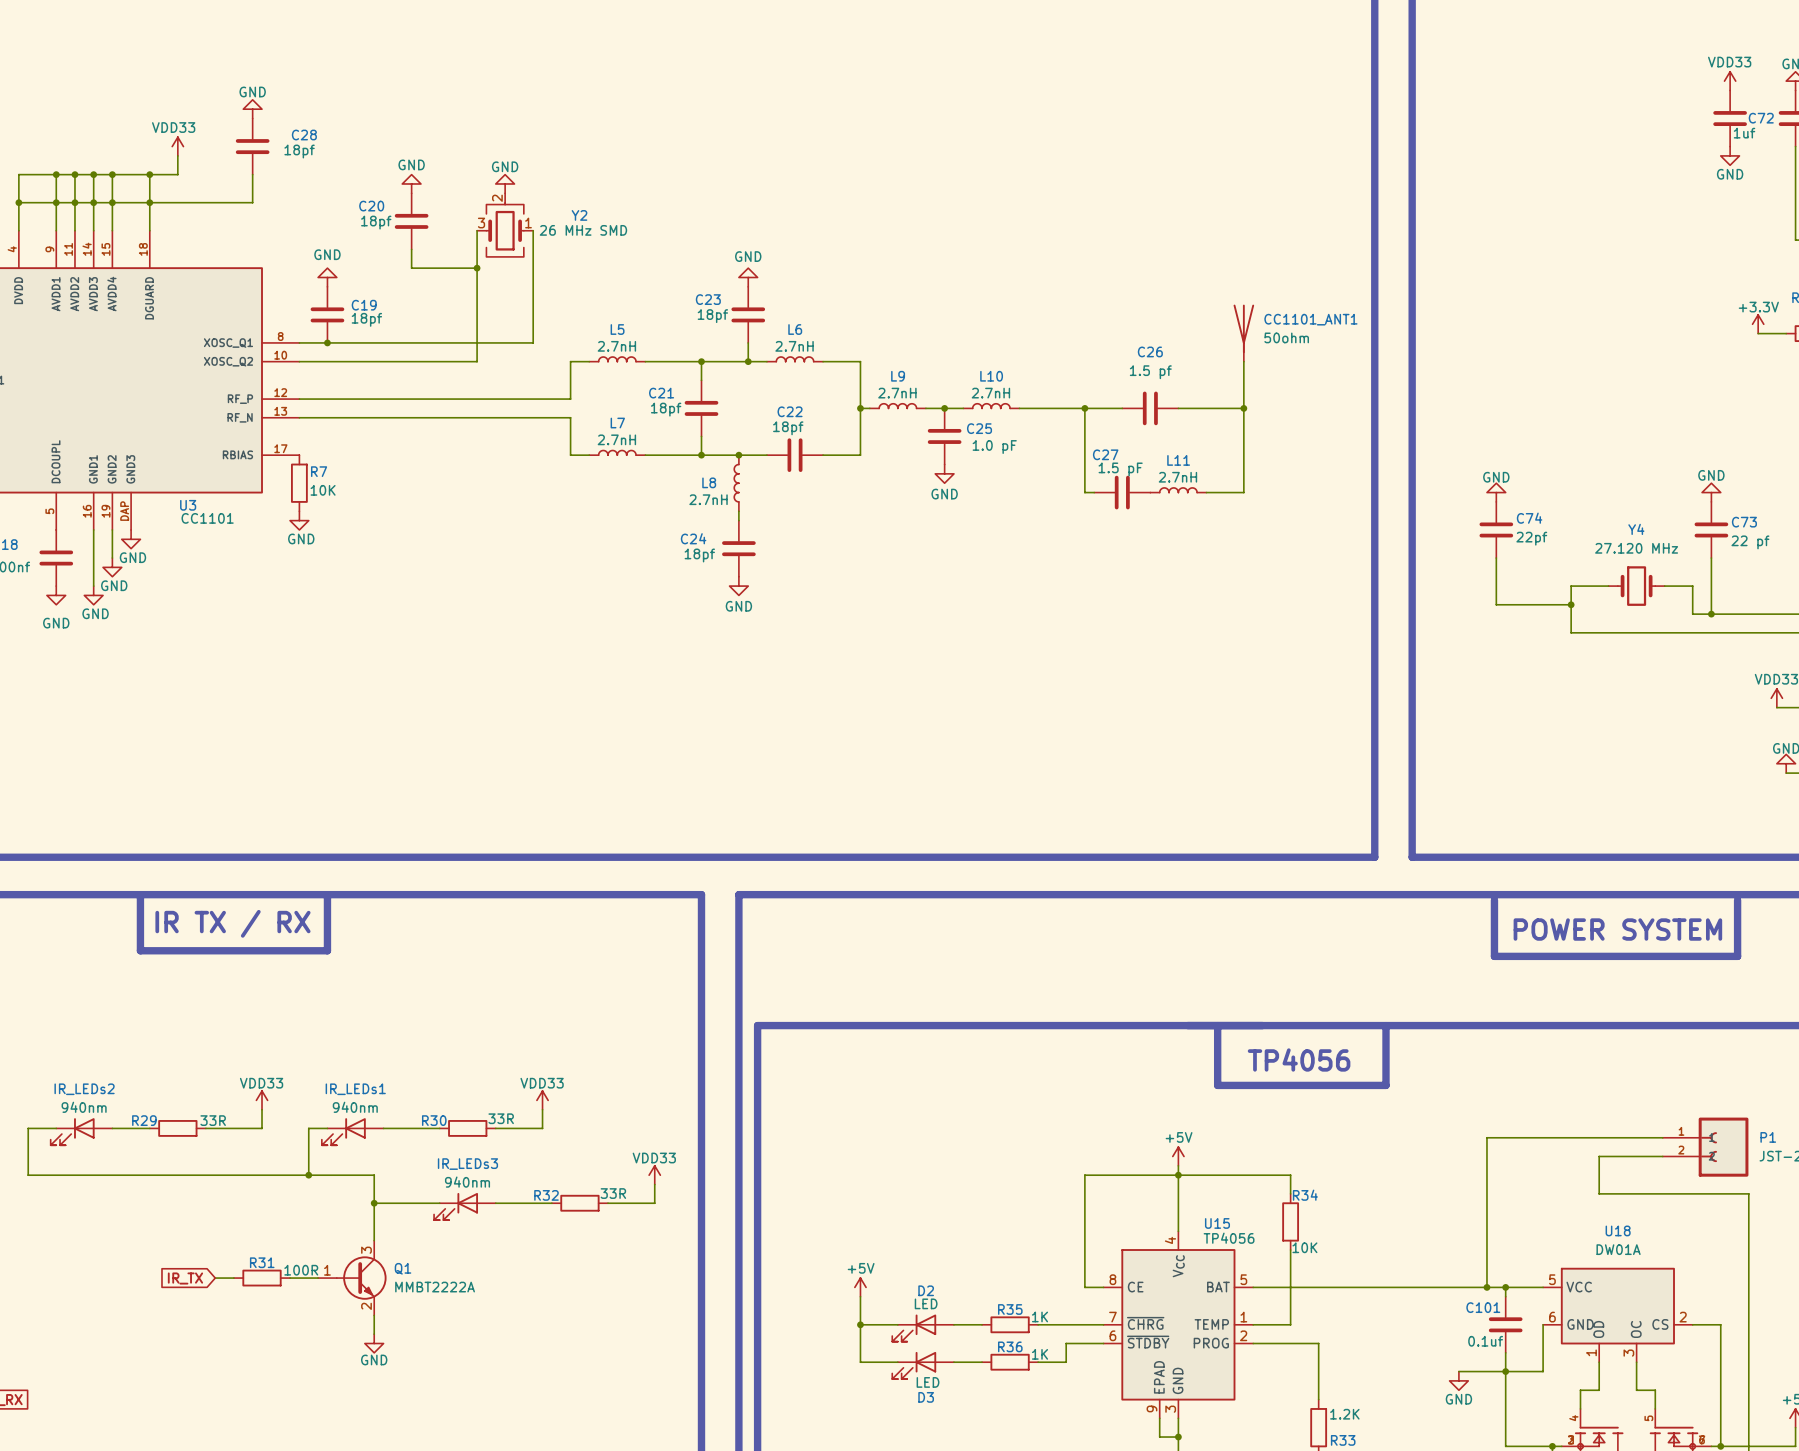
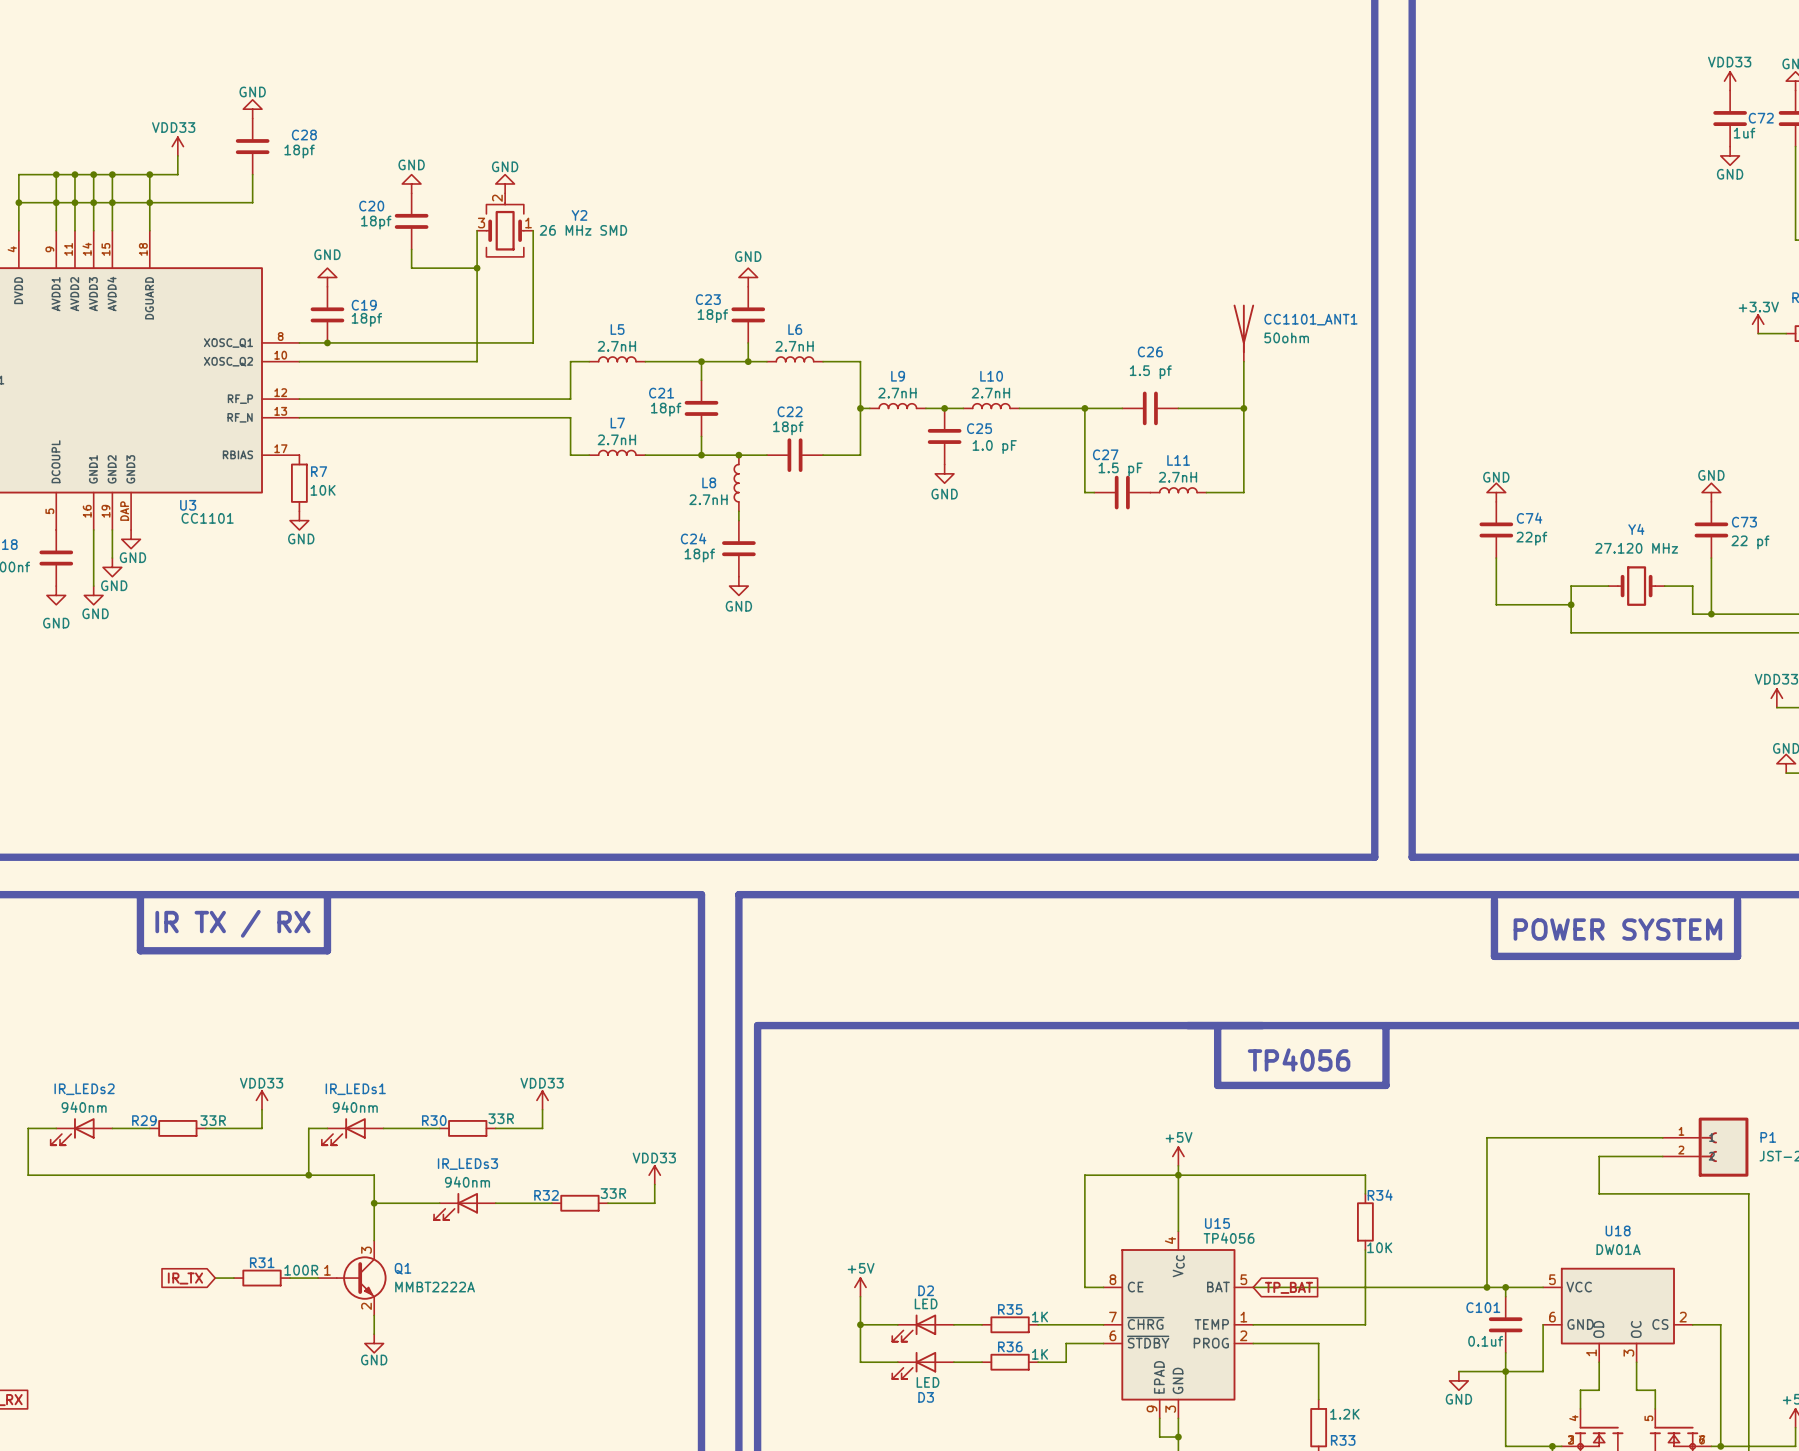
wire: (1290, 1175) (1290, 1193) -> (1290, 1175) (1365, 1175) (1365, 1193)
R34 position: (1290, 1221) -> (1365, 1221)
wire: (1290, 1250) (1290, 1324) -> (1365, 1250) (1365, 1324) (1290, 1324)
global label: none -> TP_BAT (1289, 1287)

